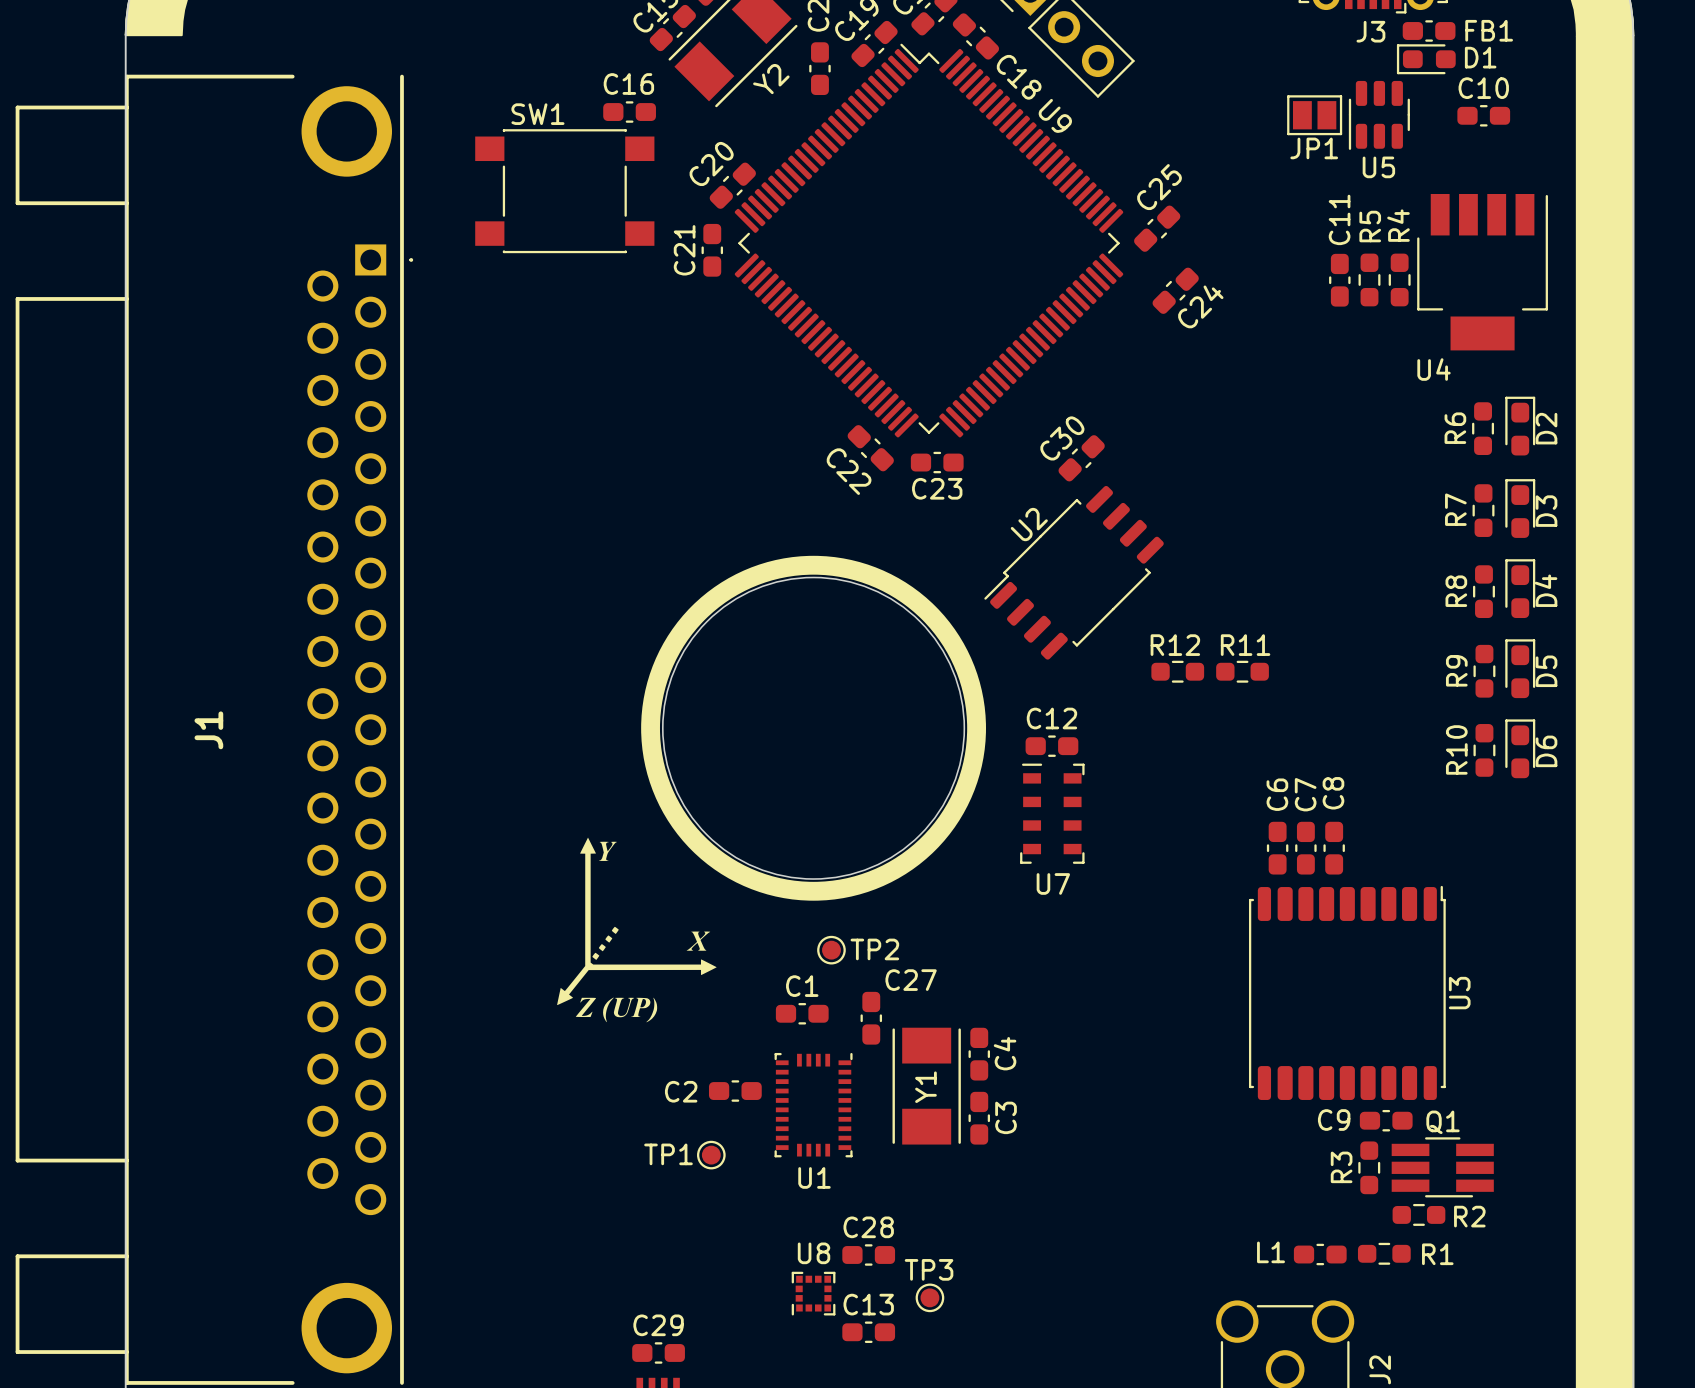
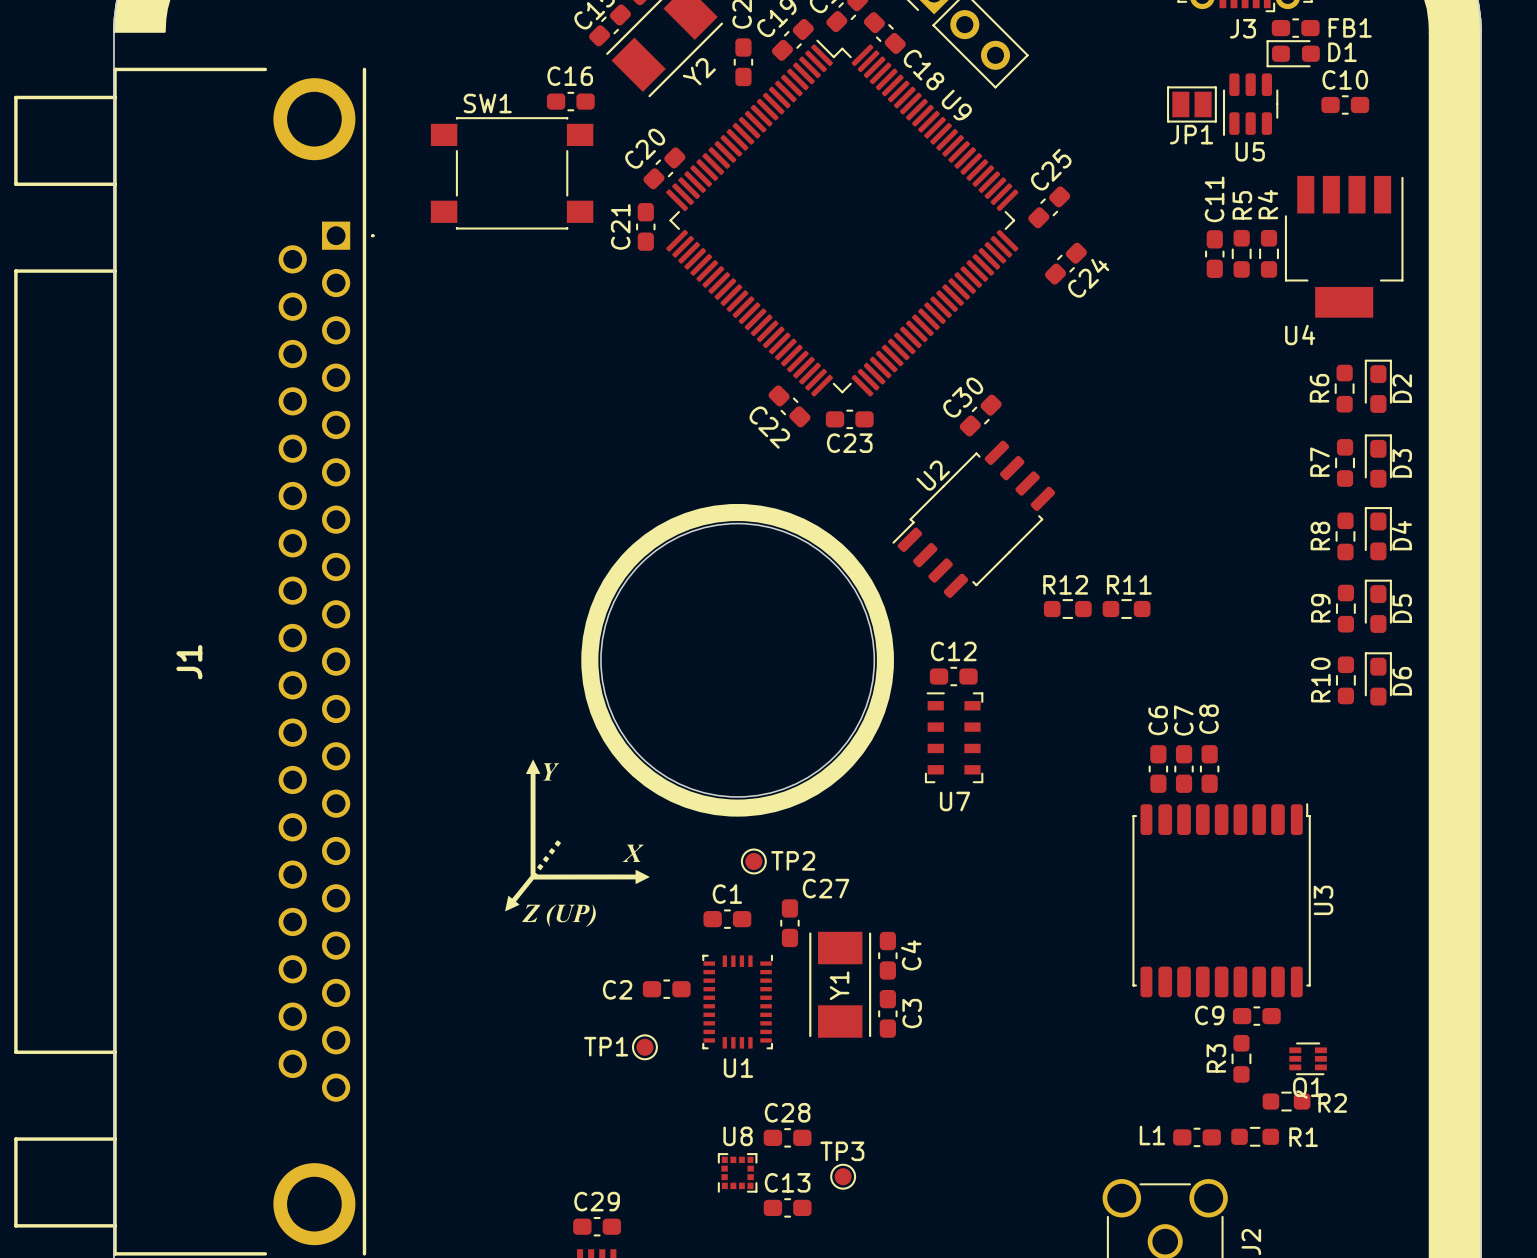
Q1 name position: Q1 (1442, 1122) -> Q1 (1308, 1088)
Q1 footprint: [1391, 1137, 1494, 1198] -> [1289, 1042, 1327, 1076]

